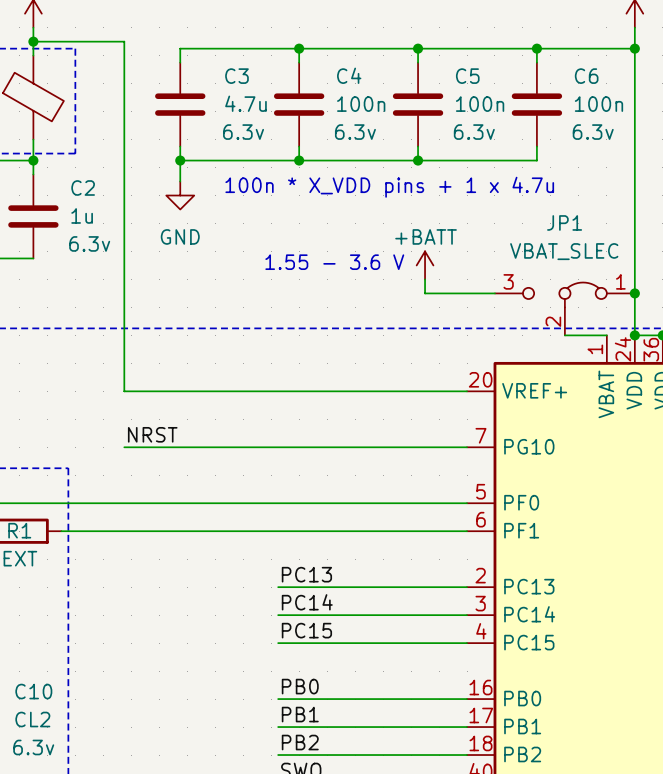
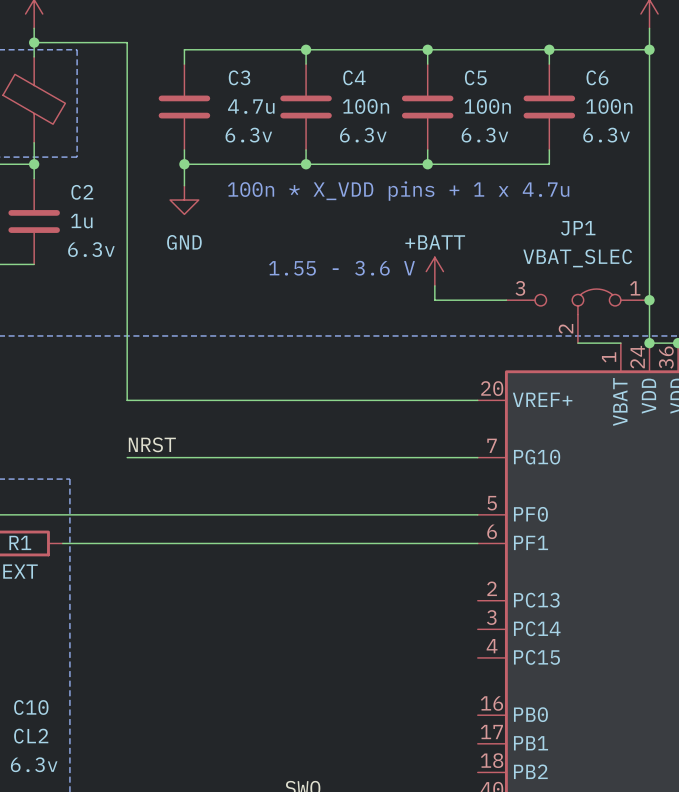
label: PC13 (306, 574) -> none
wire: (278, 587) (467, 587) -> none
label: PC14 (307, 602) -> none
wire: (278, 615) (467, 615) -> none
label: PC15 (306, 630) -> none
wire: (278, 643) (467, 643) -> none
label: PB0 (300, 686) -> none
wire: (278, 699) (467, 699) -> none
label: PB1 (300, 714) -> none
wire: (278, 727) (467, 727) -> none
label: PB2 (300, 742) -> none
wire: (278, 755) (467, 755) -> none

